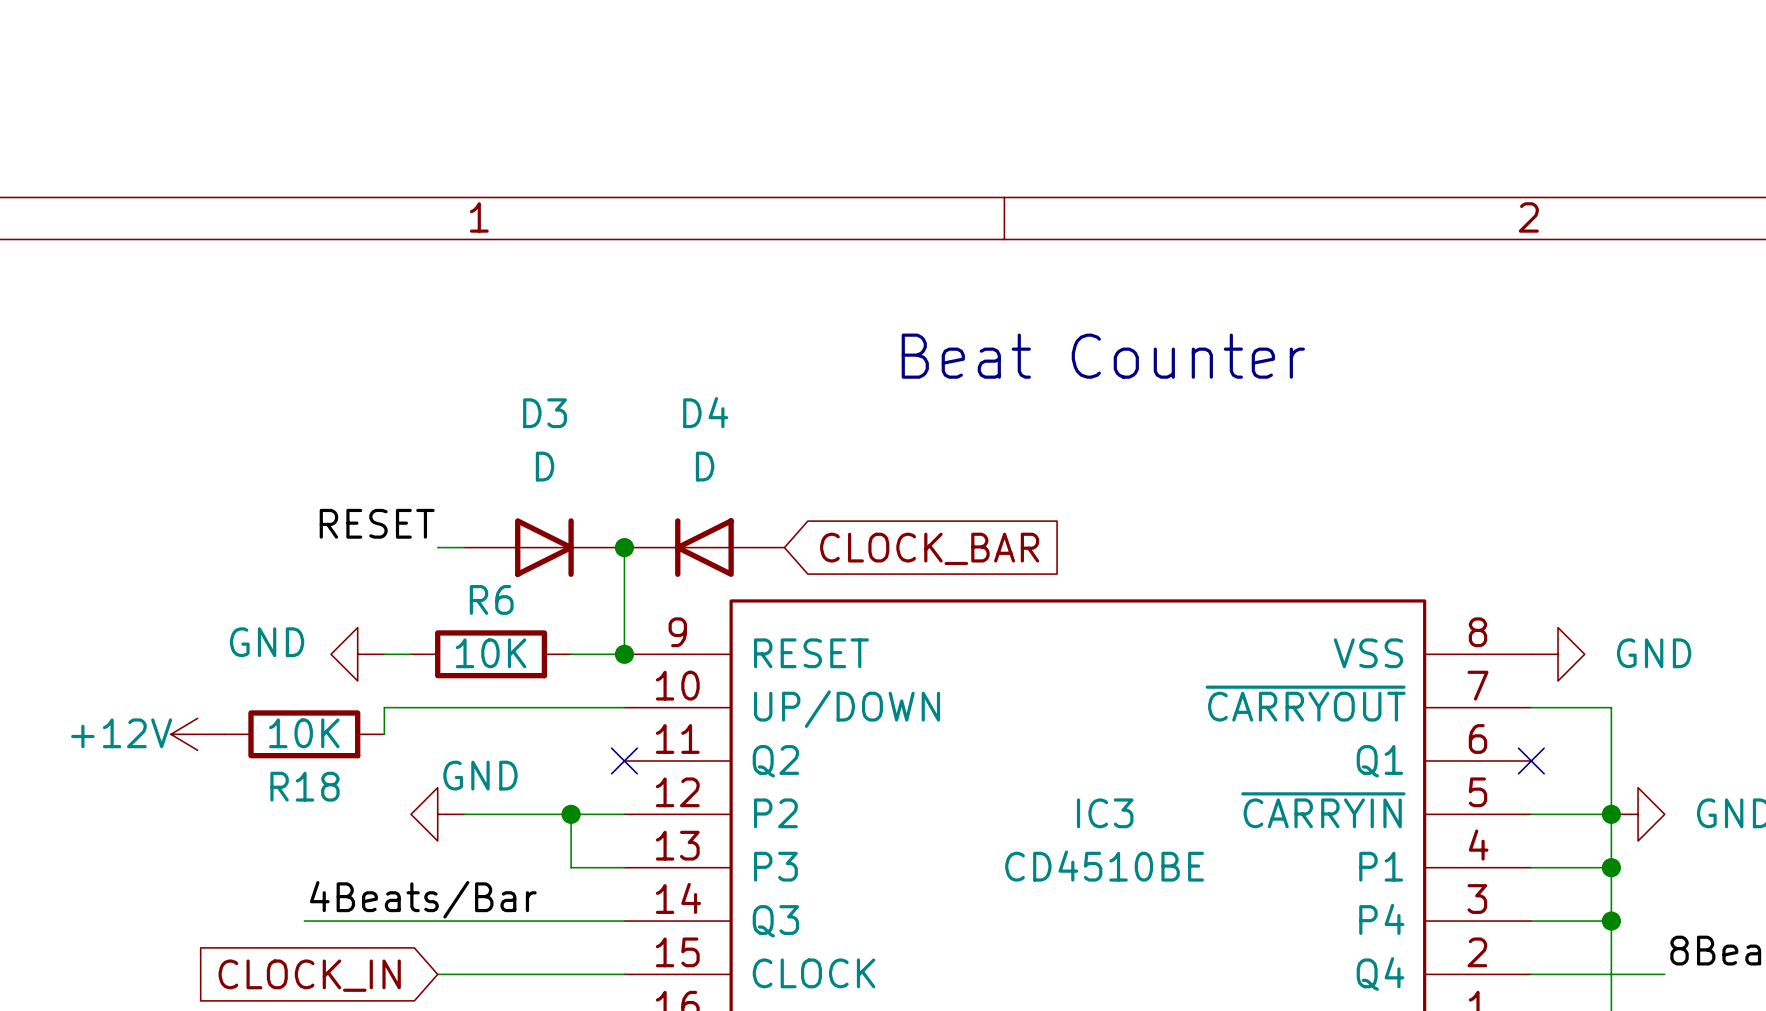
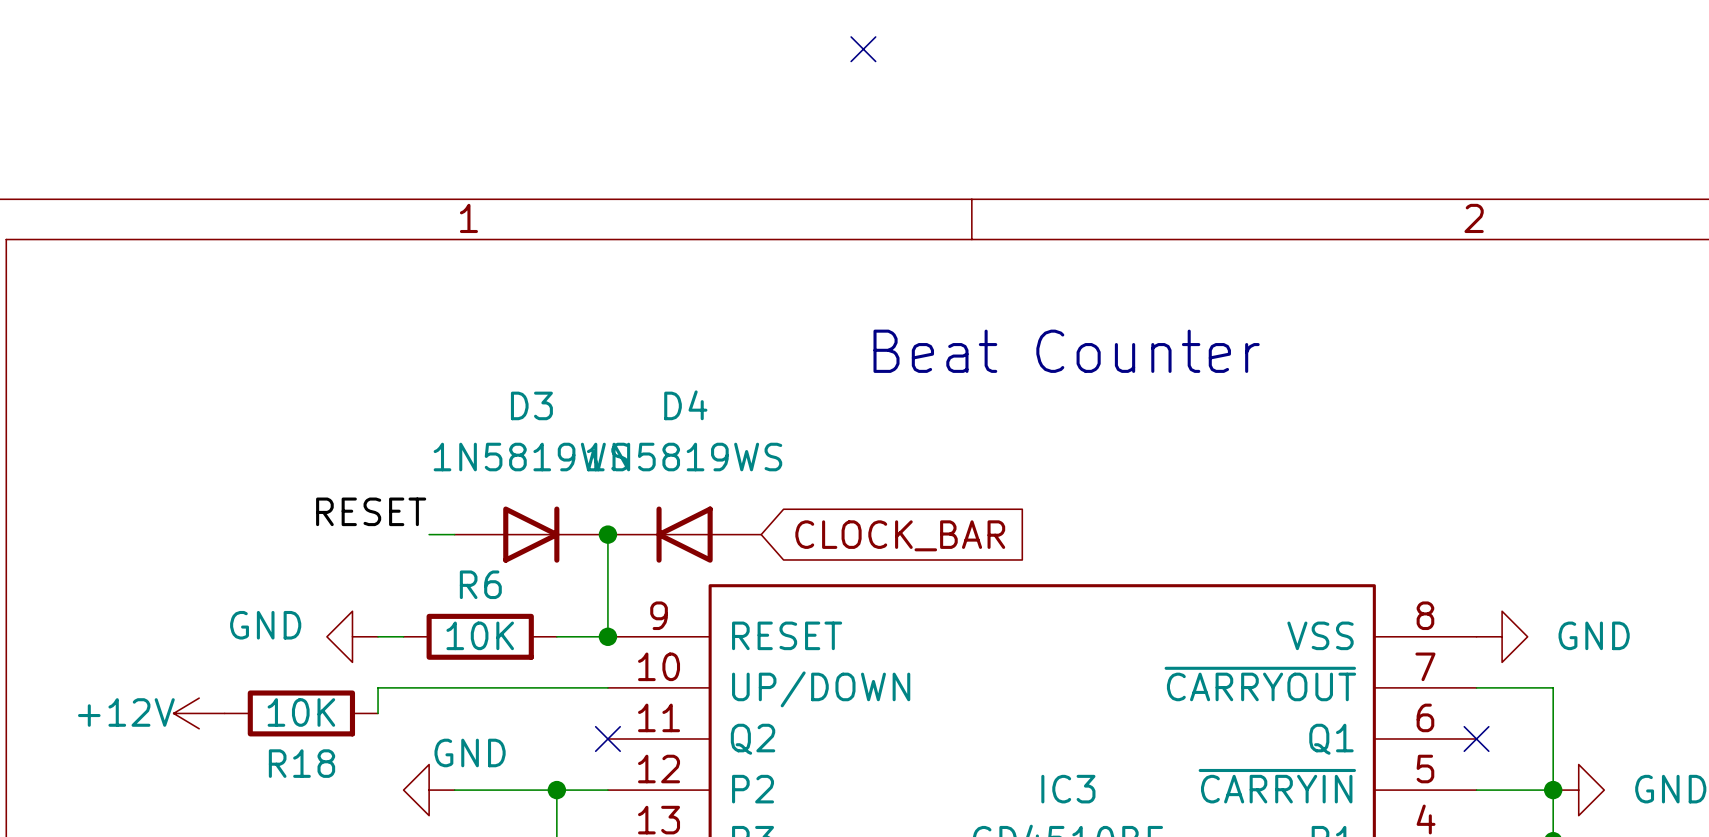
no-connect mark: none -> (863, 49)
D3 value: D (545, 466) -> 1N5819WS (531, 457)
D4 value: D (705, 466) -> 1N5819WS (684, 457)

